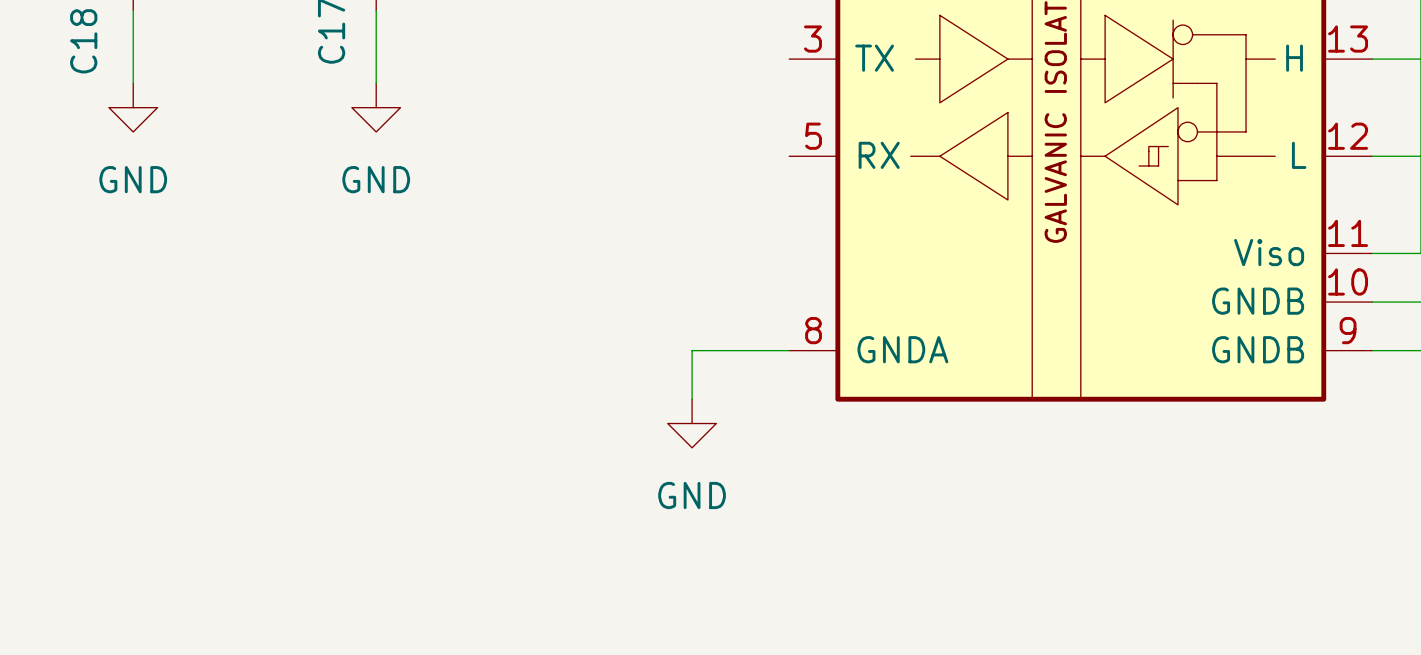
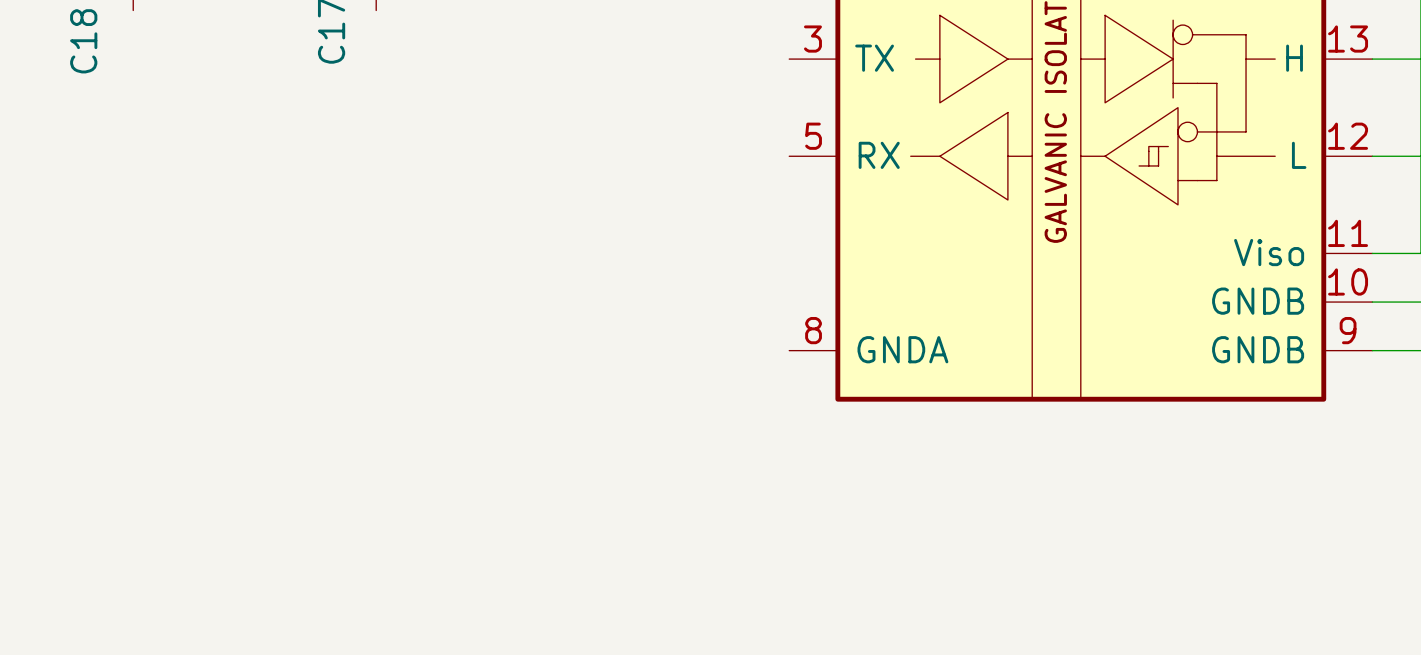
wire: (133, 10) (133, 83) -> none
wire: (376, 10) (376, 83) -> none
power symbol: GND (133, 107) -> none
power symbol: GND (376, 107) -> none
wire: (789, 350) (692, 350) (692, 399) -> none
power symbol: GND (692, 423) -> none

